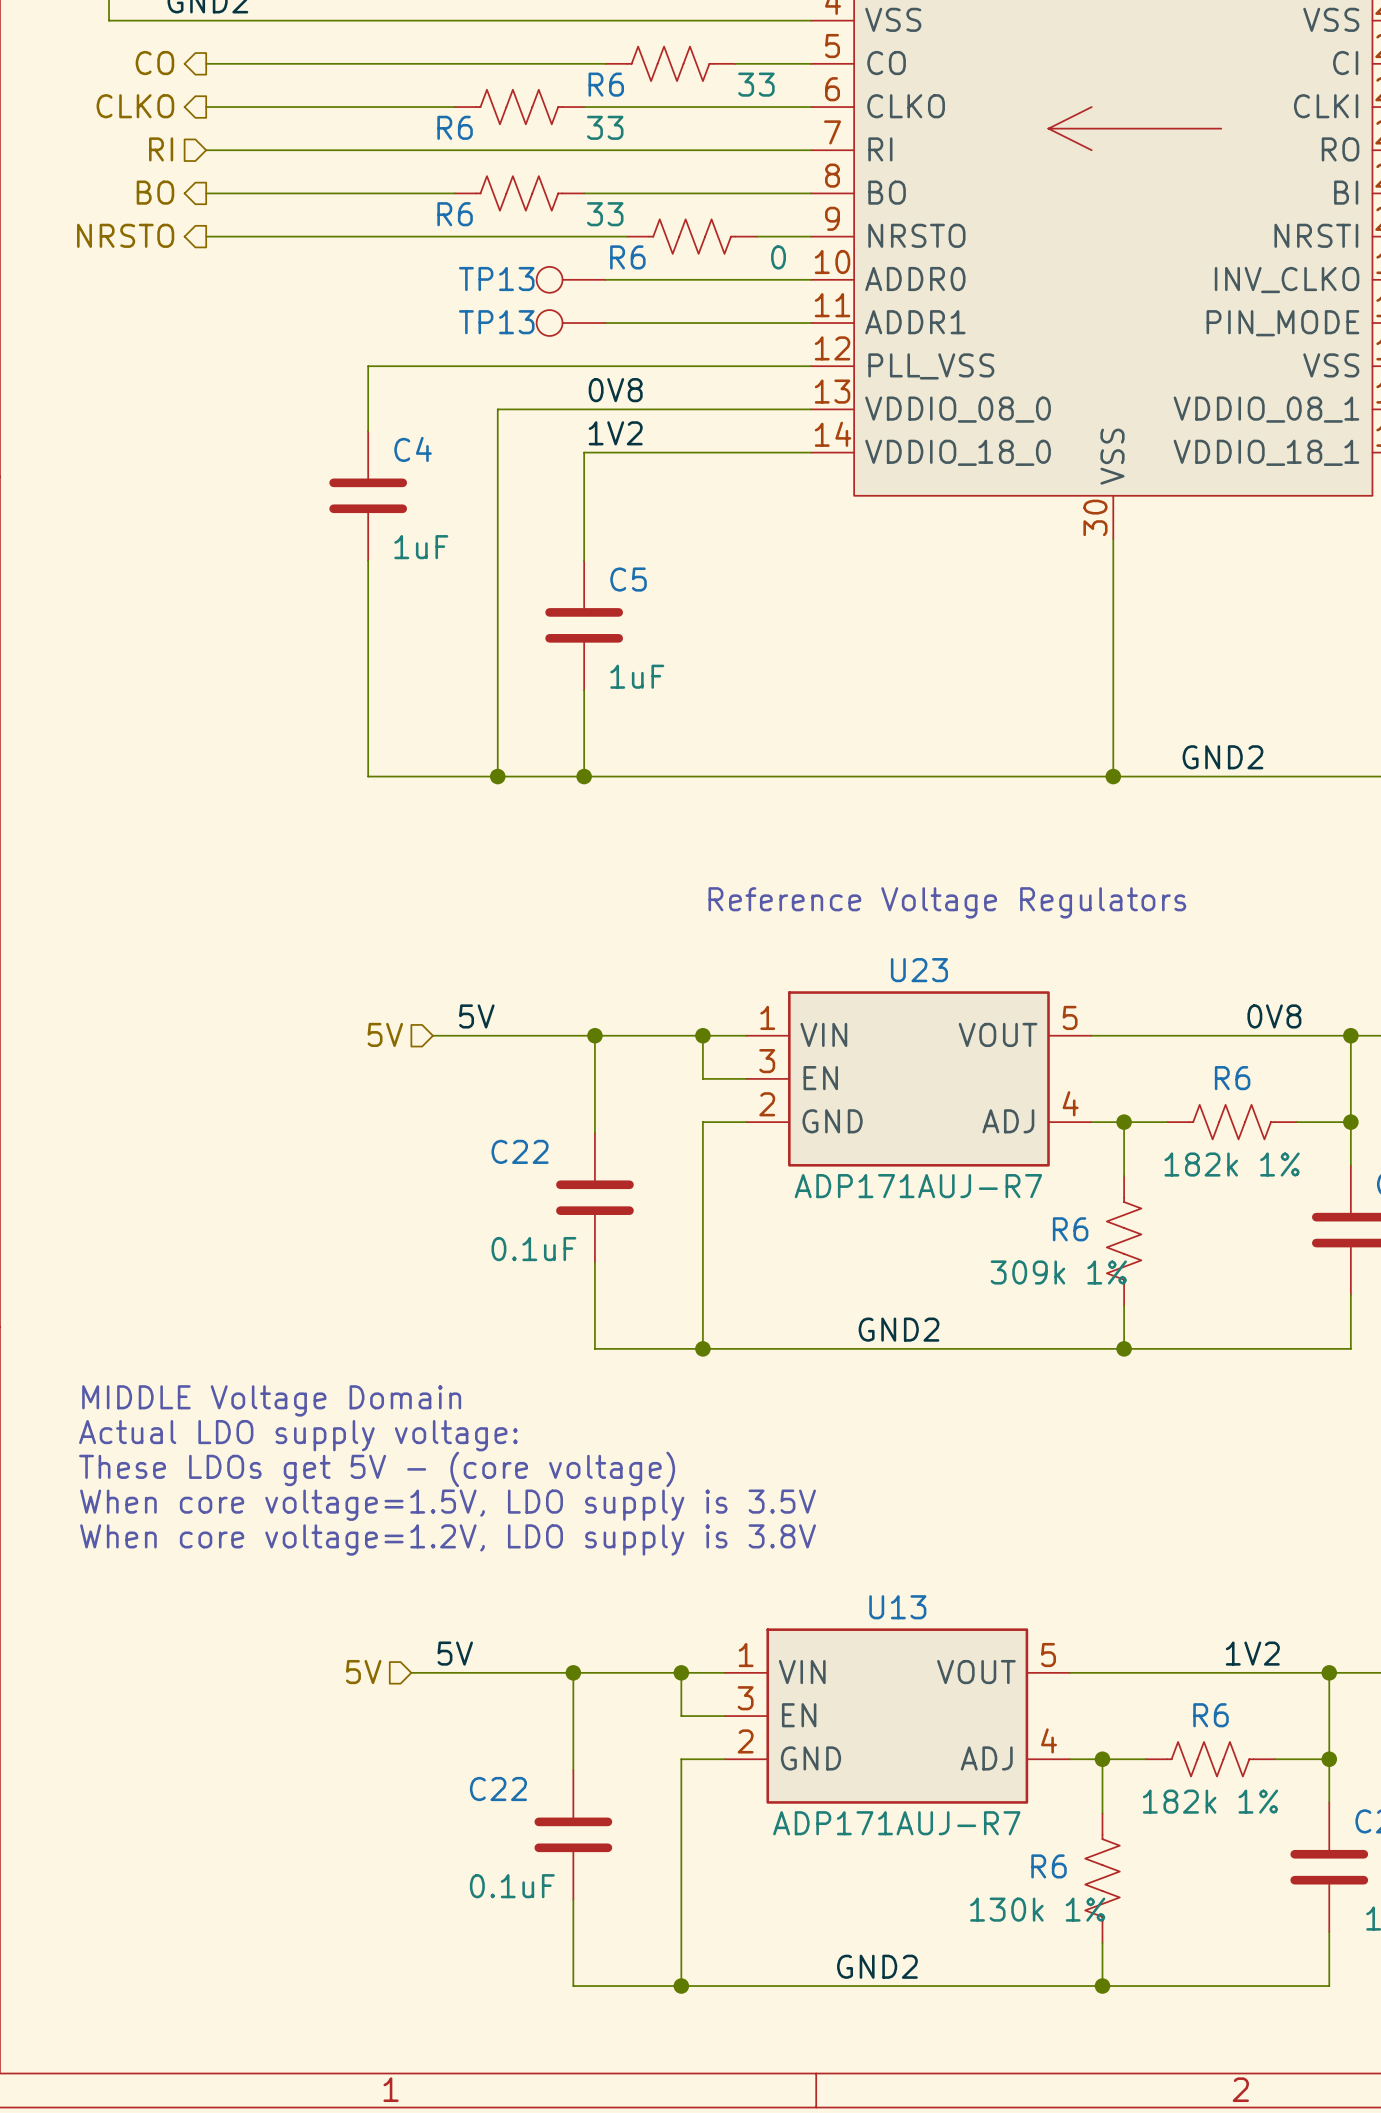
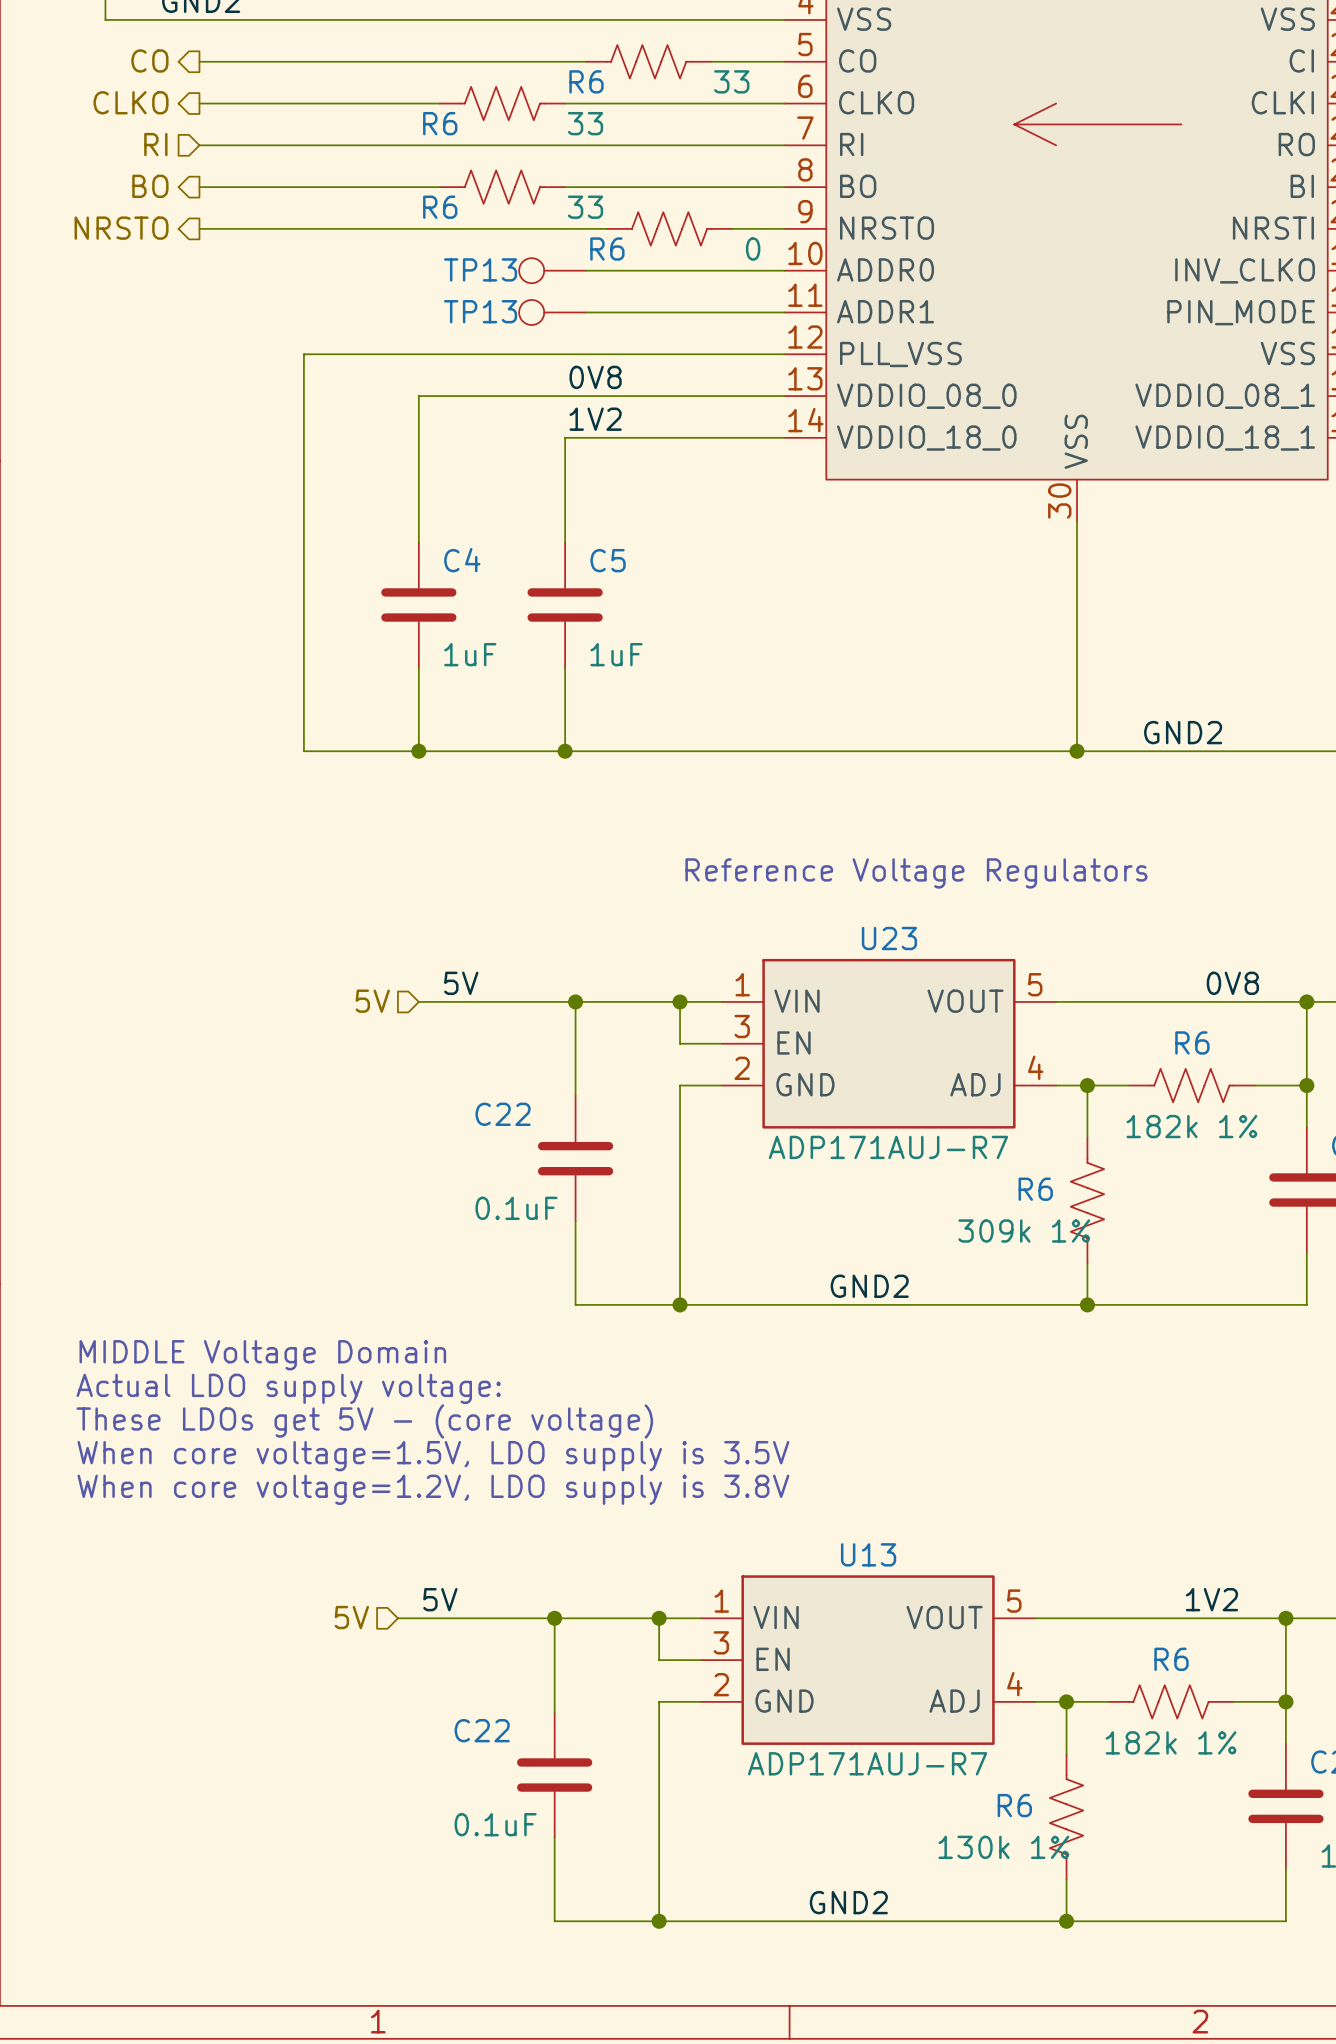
wire: (368, 366) (368, 431) -> none
wire: (497, 409) (497, 776) -> (481, 396) (418, 396) (418, 542)
C4 position: (368, 495) -> (418, 604)
wire: (368, 560) (368, 776) -> (356, 354) (303, 354) (303, 751) (356, 751)
wire: none -> (418, 667) (418, 751)
junction position: (497, 776) -> (418, 751)

